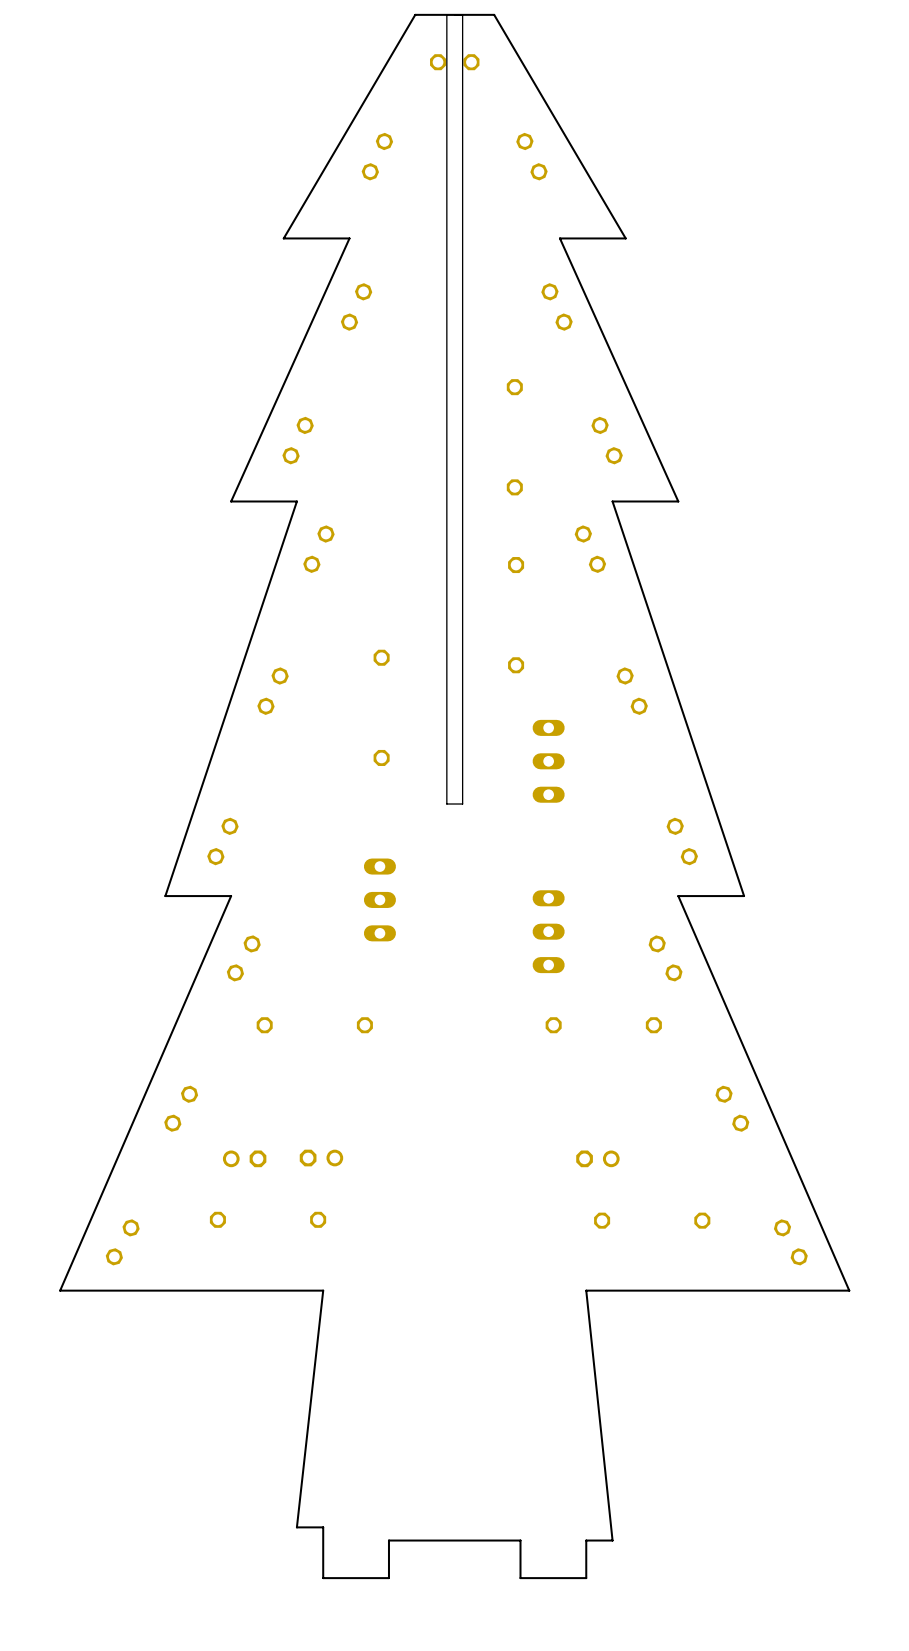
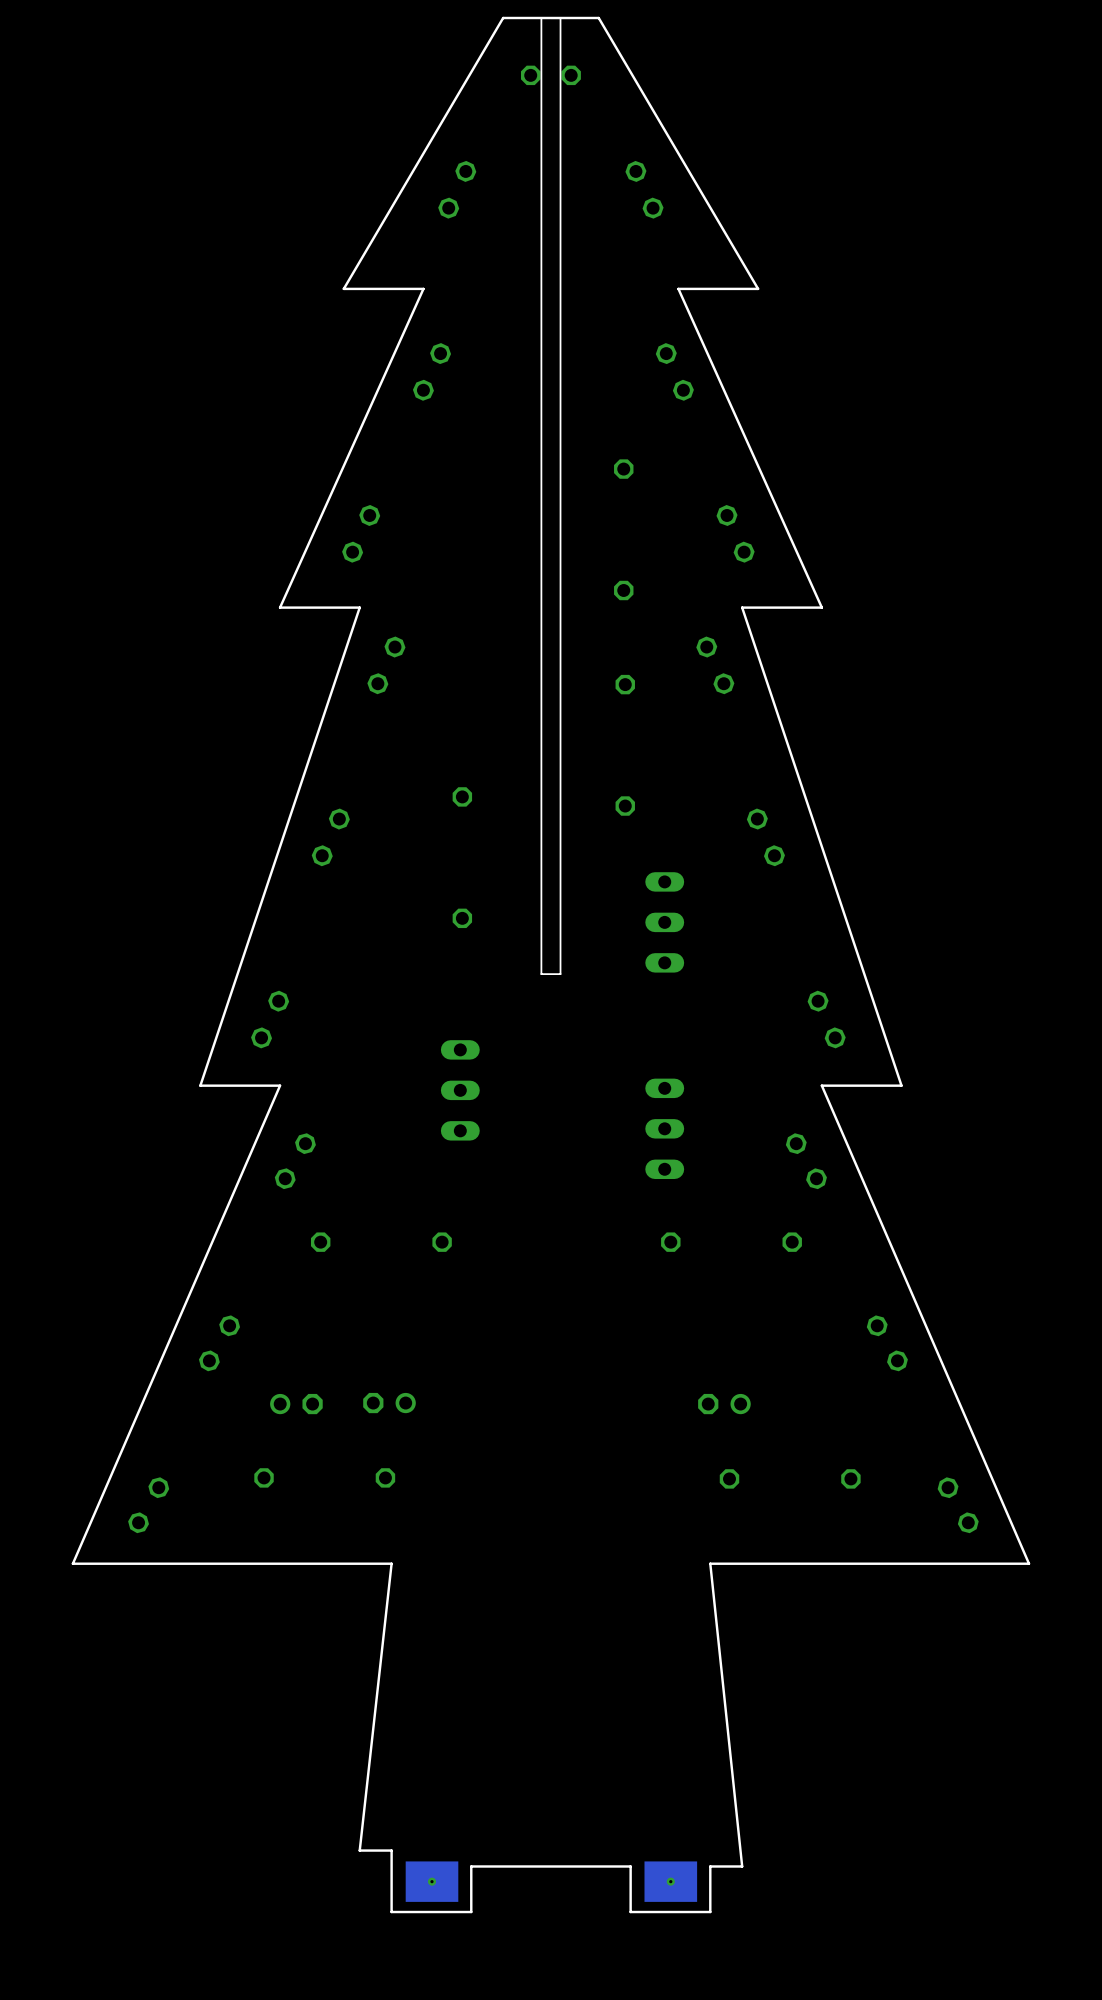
part: none -> (432, 1881)
part: none -> (670, 1881)

